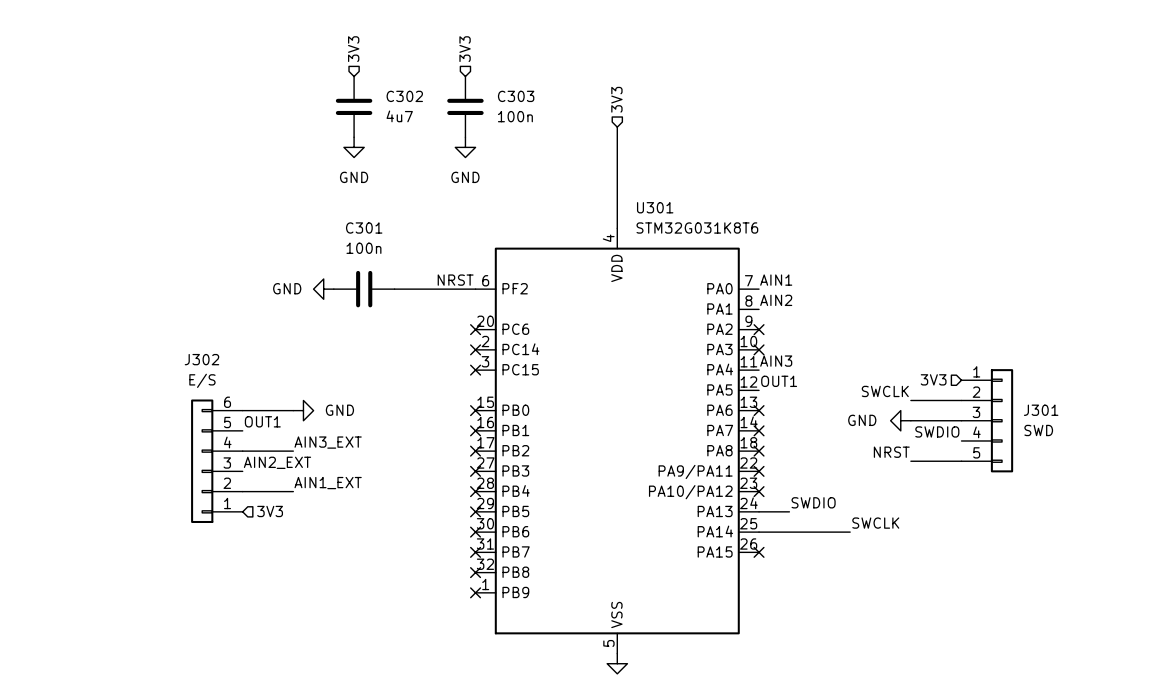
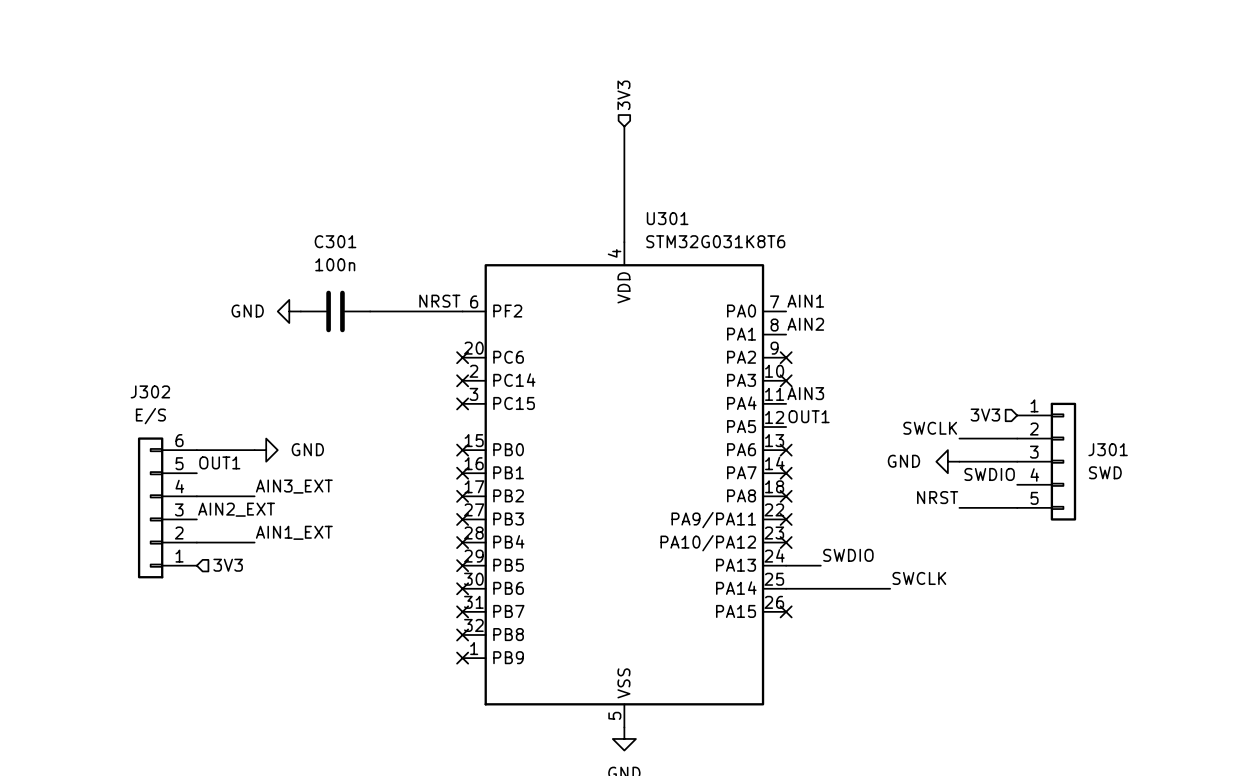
hierarchical label: 3V3 (353, 49) -> none
hierarchical label: 3V3 (465, 49) -> none
C302: 4u7 (354, 106) -> none
C303: 100n (465, 106) -> none
power symbol: GND (354, 147) -> none
power symbol: GND (465, 147) -> none

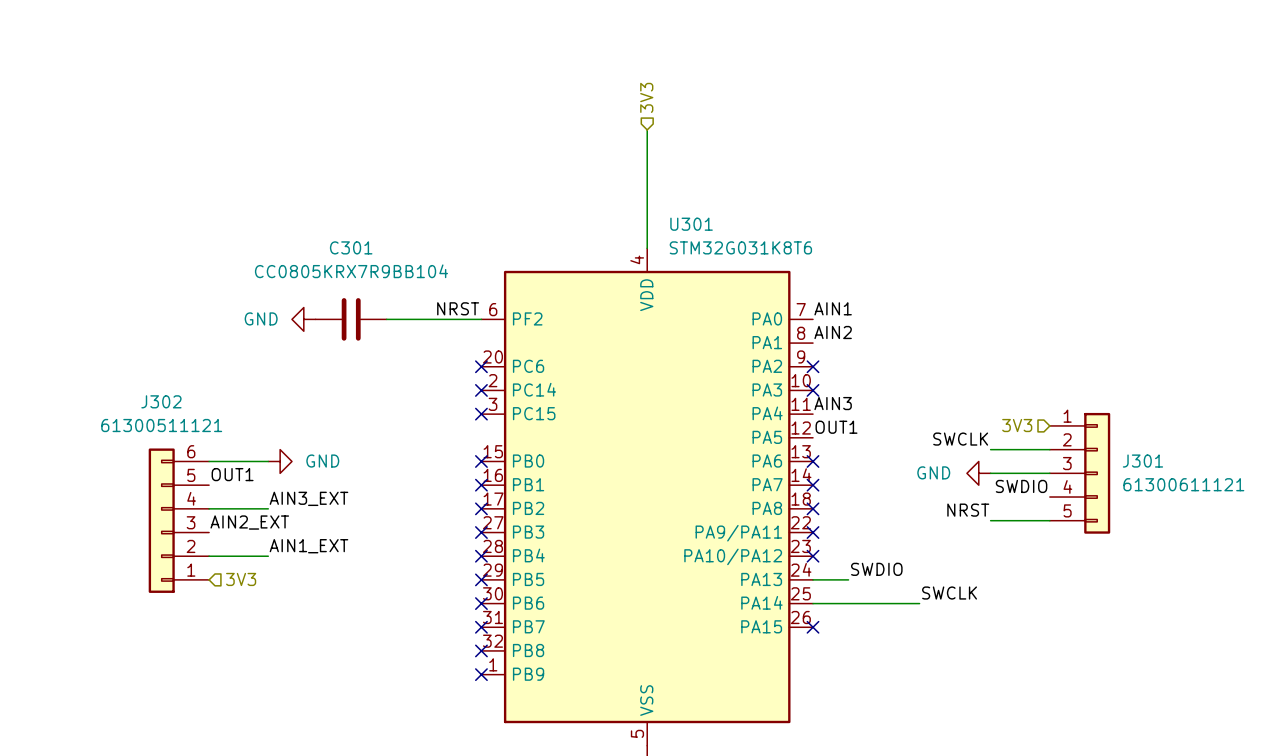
C301 value: 100n (335, 264) -> CC0805KRX7R9BB104 (351, 271)
J302 value: E/S (150, 416) -> 61300511121 (161, 425)
J301 value: SWD (1105, 472) -> 61300611121 (1183, 484)

